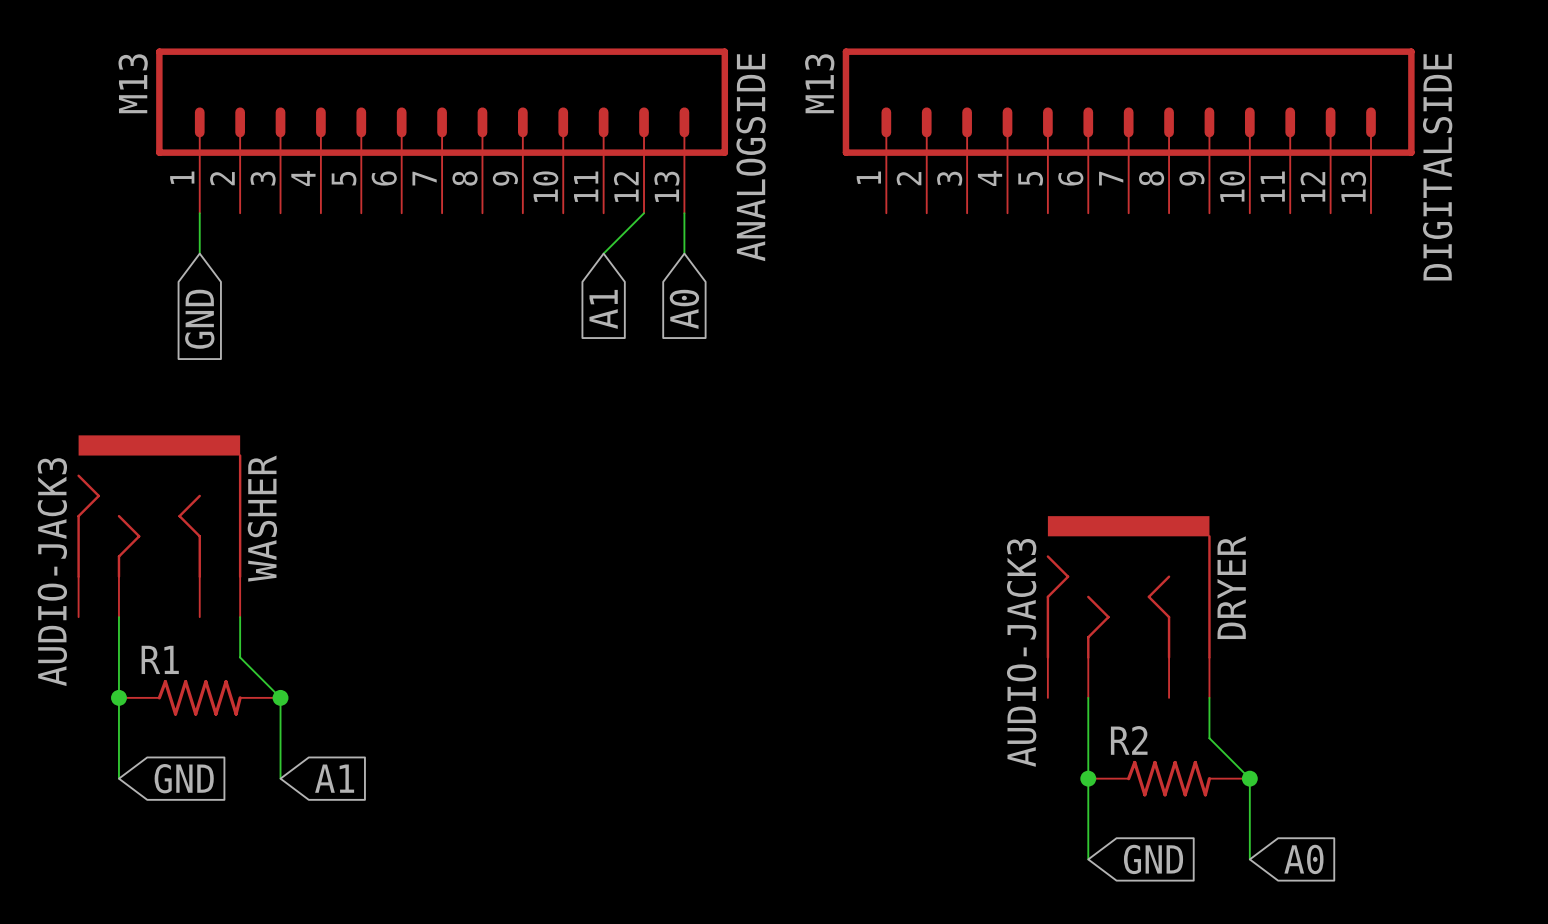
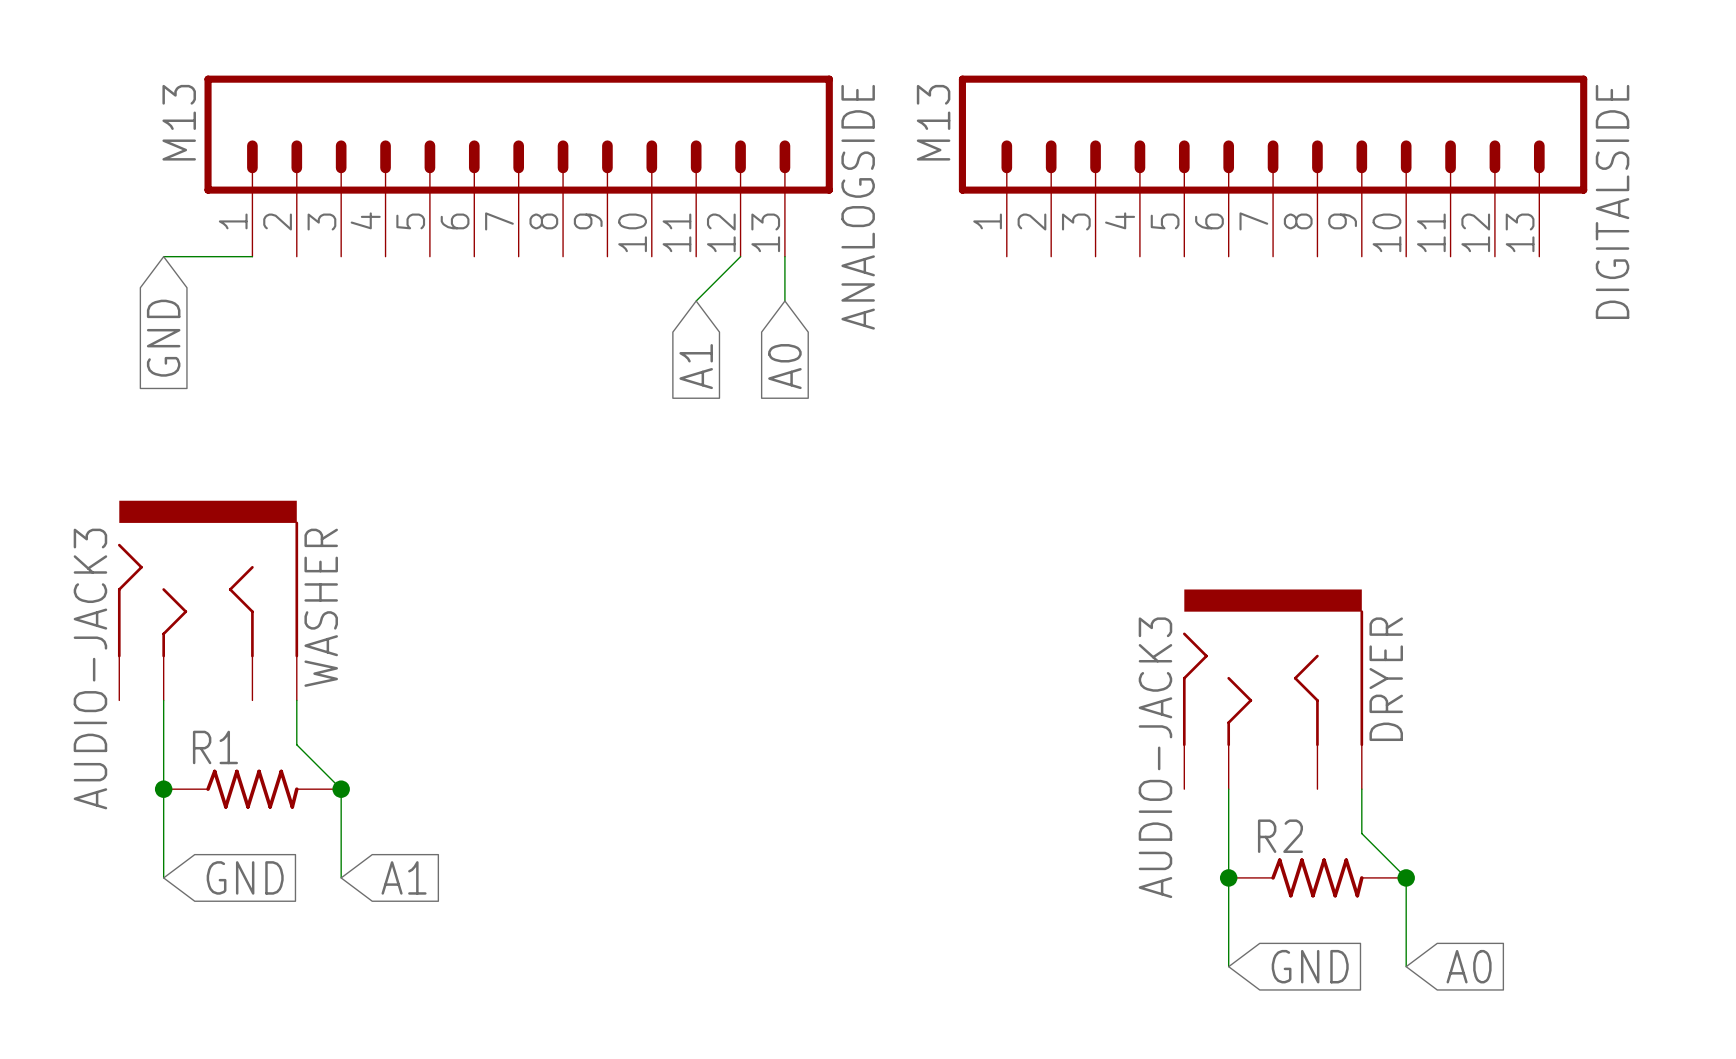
wire: (199, 213) (199, 253) -> (252, 256) (163, 256)
global label position: GND (199, 319) -> GND (163, 338)

